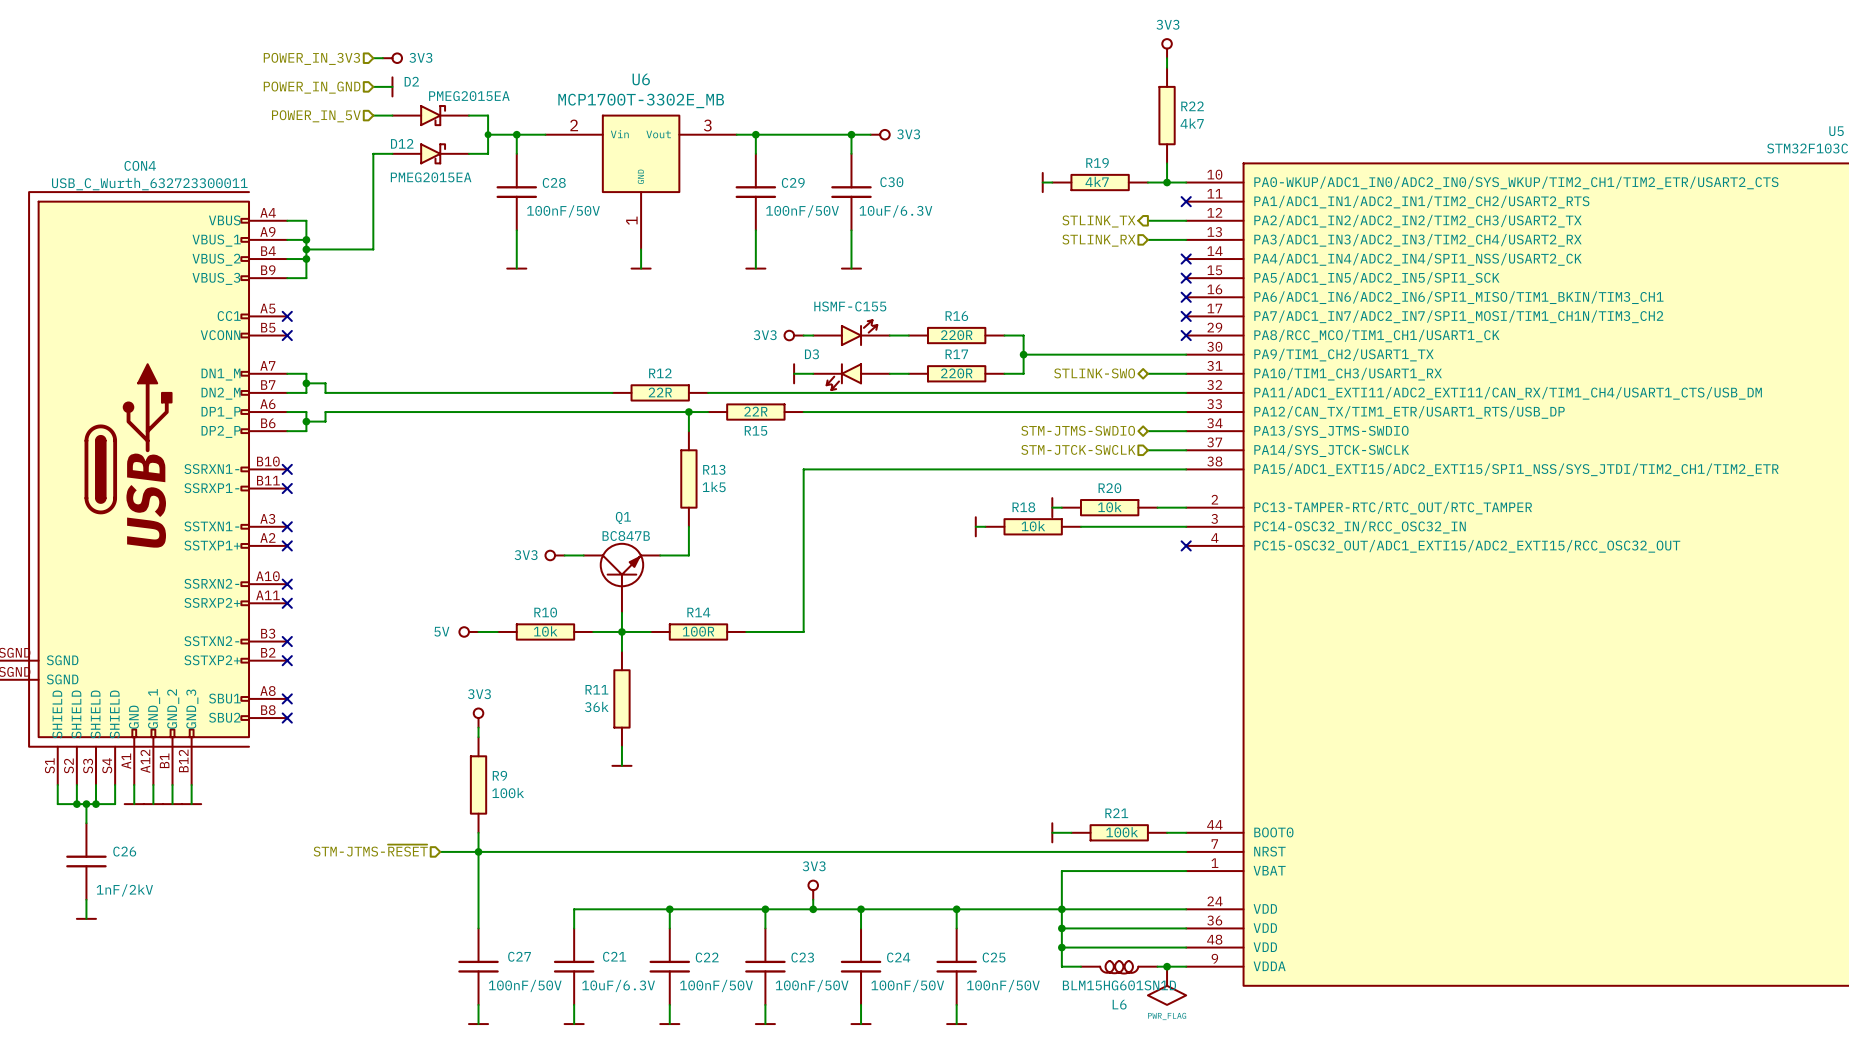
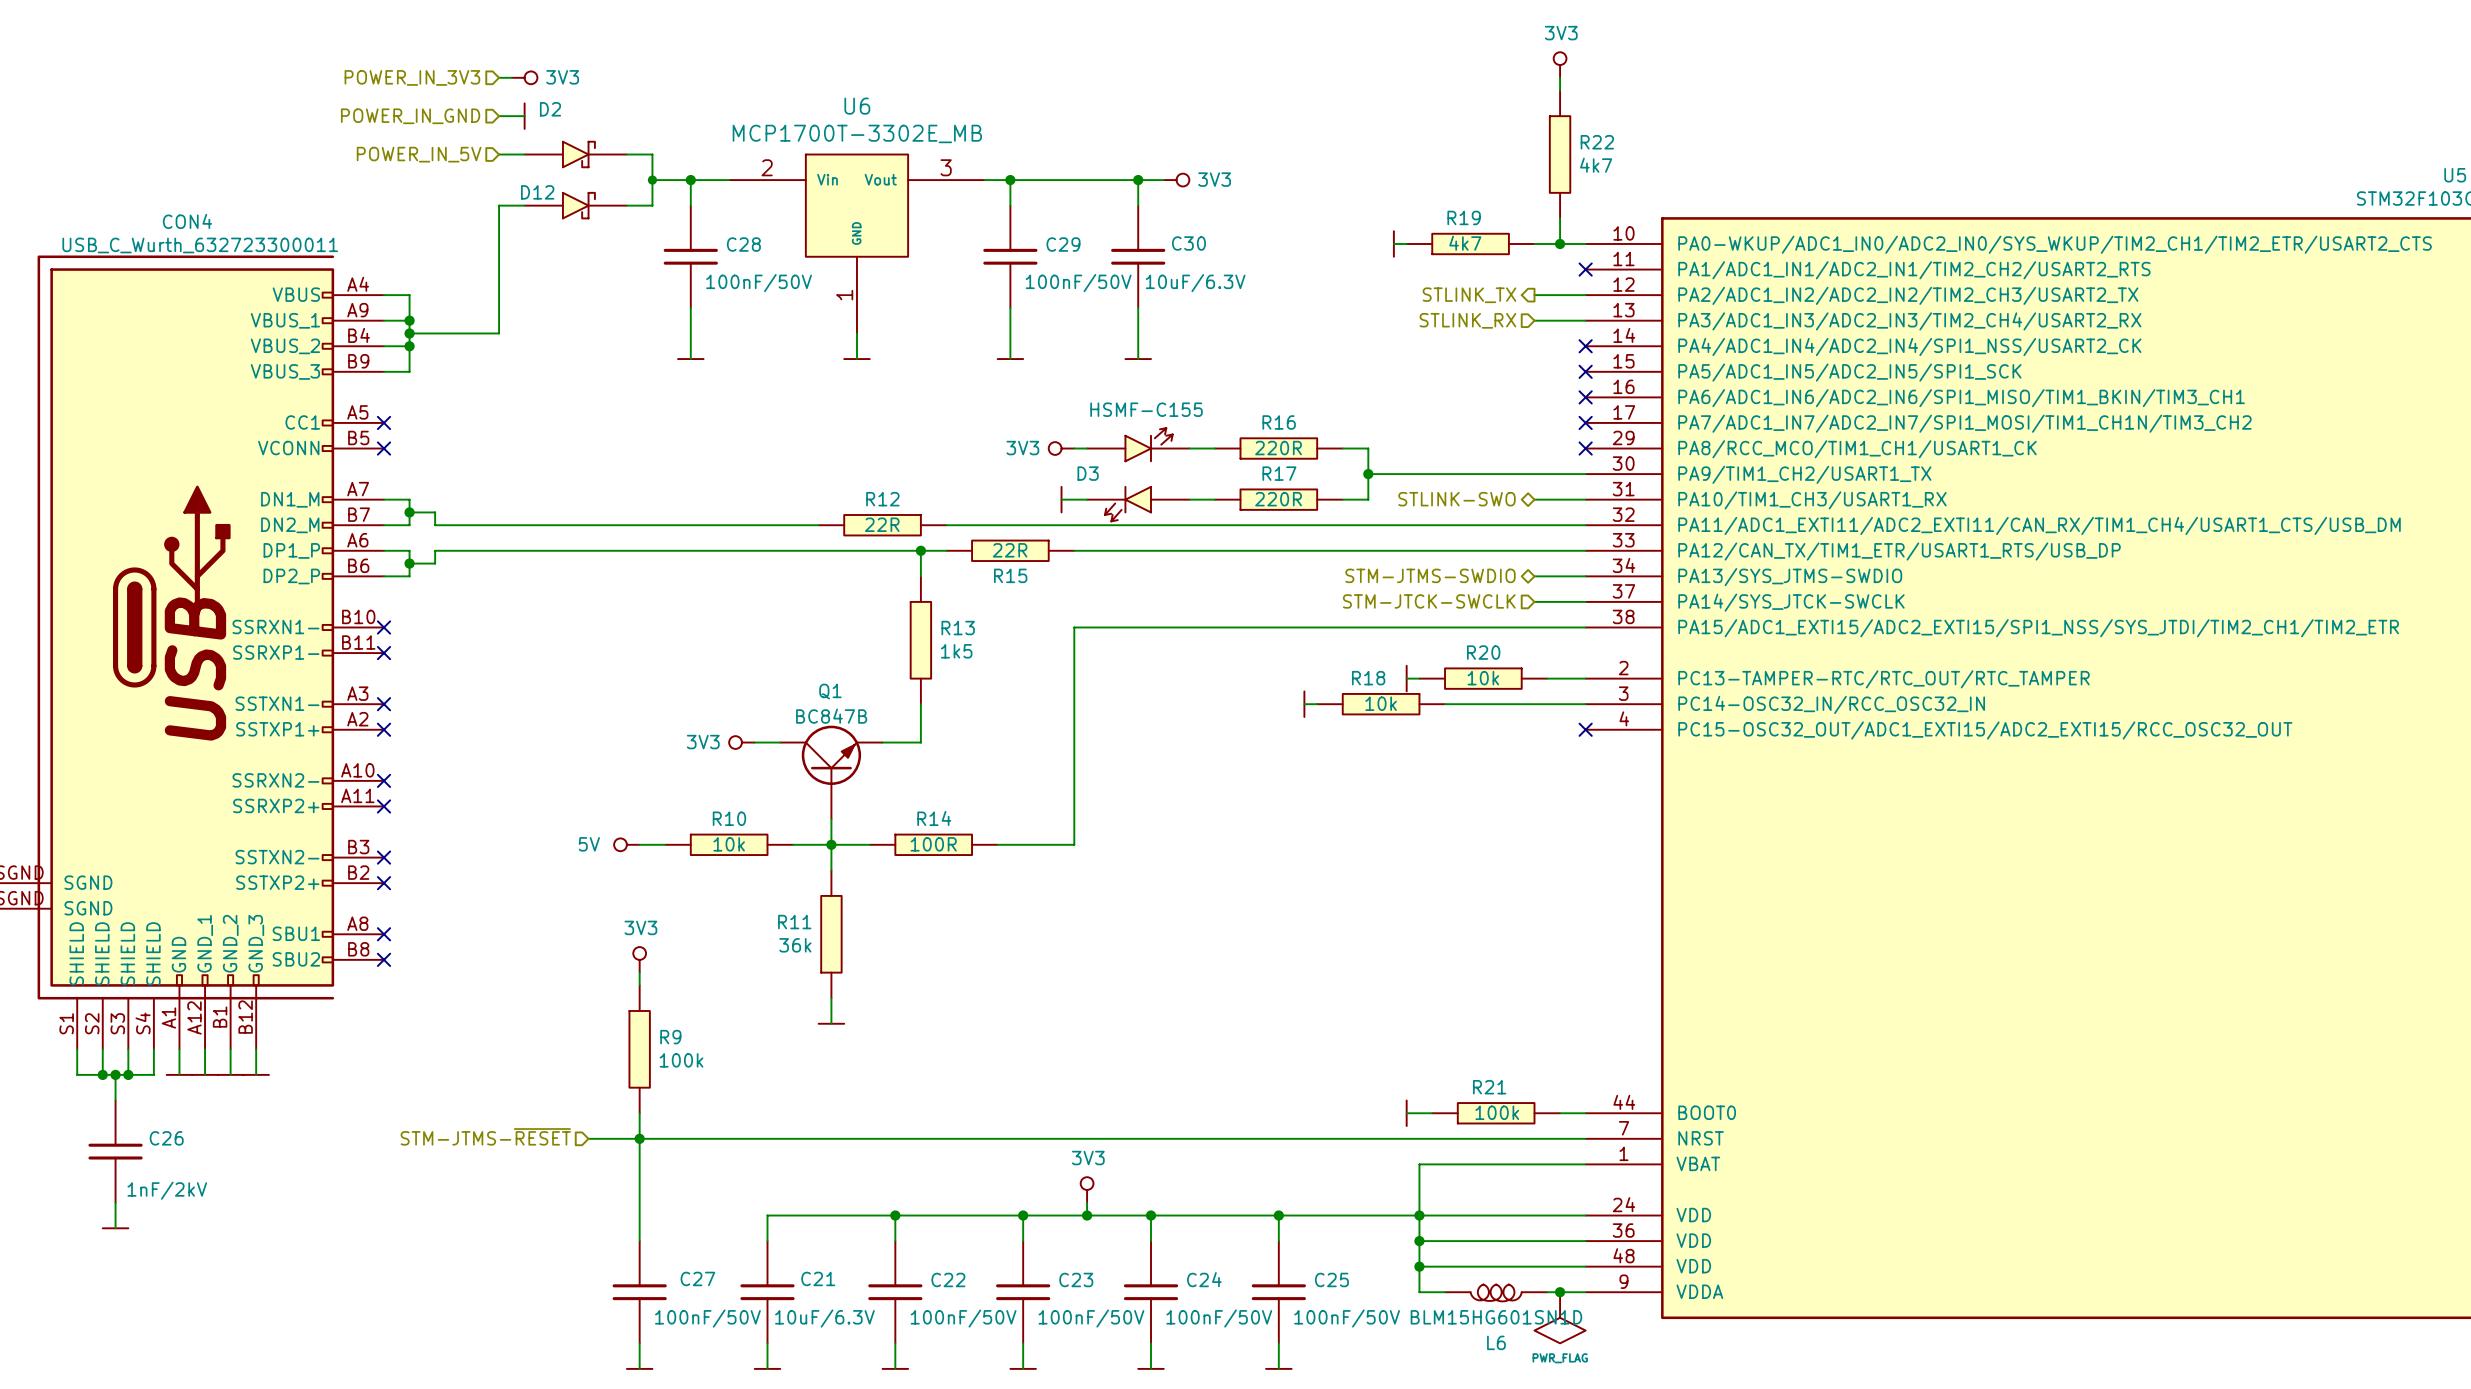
D2 value: PMEG2015EA (469, 96) -> none
D12 value: PMEG2015EA (431, 177) -> none

